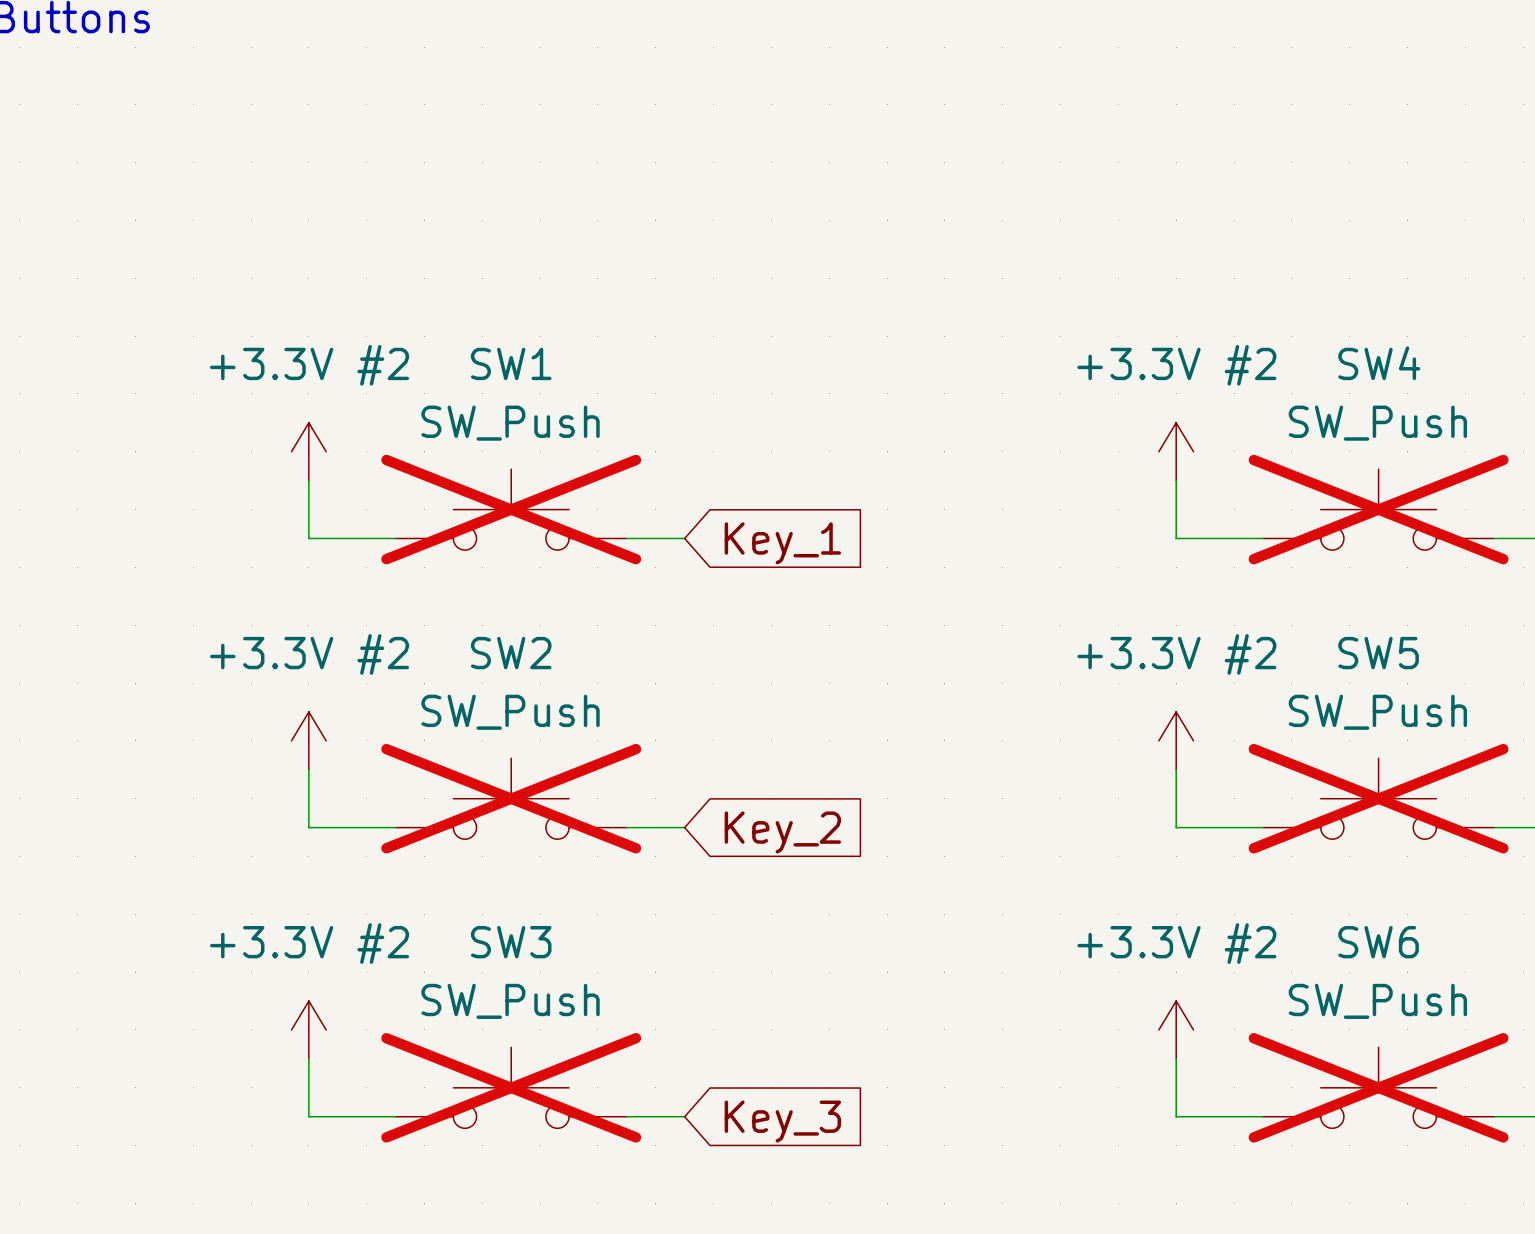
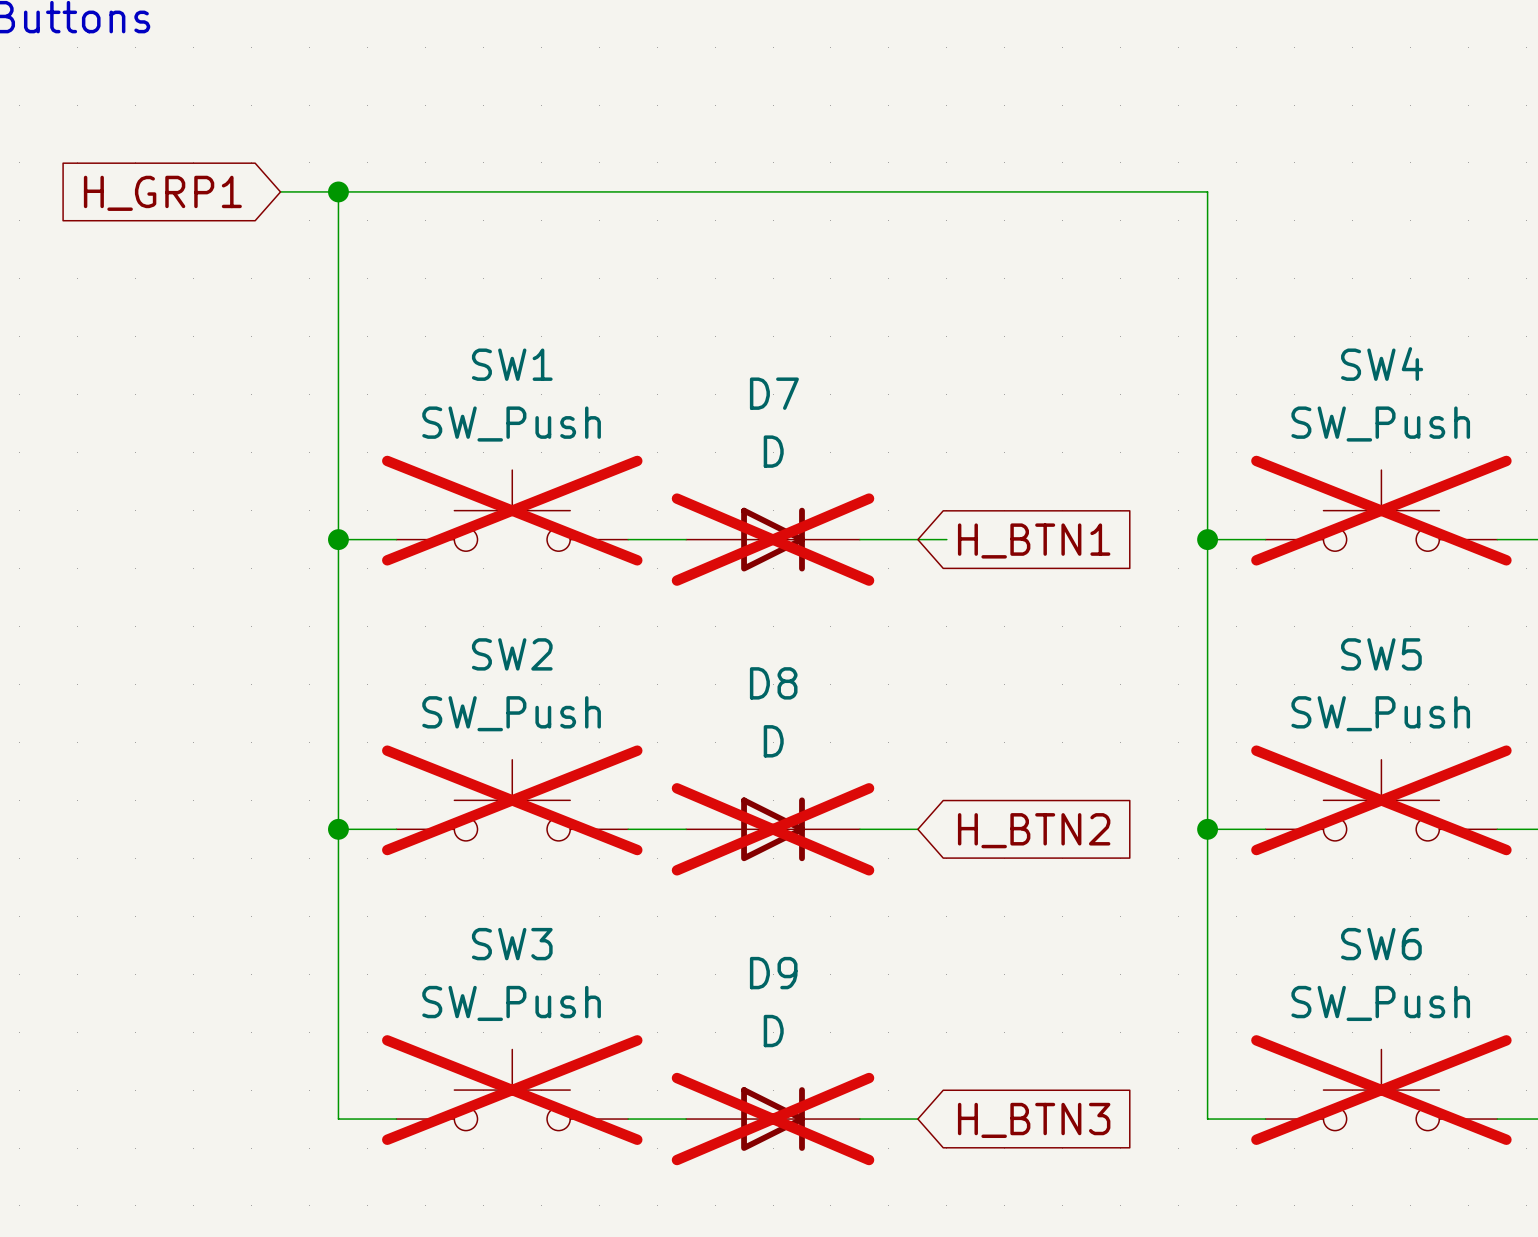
junction: none -> (338, 191)
global label: none -> H_GRP1 (162, 193)
power symbol: +3.3V #2 (308, 451) -> none
power symbol: +3.3V #2 (1176, 451) -> none
wire: (308, 480) (308, 538) (337, 538) -> none
wire: (1176, 480) (1176, 538) (1205, 538) -> none
junction: none -> (338, 539)
D7: none -> D (773, 539)
wire: none -> (859, 539) (946, 539)
junction: none -> (1207, 539)
global label: none -> H_BTN1 (1034, 540)
global label: Key_1 (782, 543) -> none
power symbol: +3.3V #2 (308, 740) -> none
power symbol: +3.3V #2 (1176, 740) -> none
wire: (308, 769) (308, 827) (337, 827) -> none
wire: (1176, 769) (1176, 827) (1205, 827) -> none
junction: none -> (338, 829)
D8: none -> D (773, 829)
wire: none -> (859, 829) (917, 829)
junction: none -> (1207, 829)
global label: none -> H_BTN2 (1034, 830)
global label: Key_2 (782, 832) -> none
power symbol: +3.3V #2 (308, 1029) -> none
power symbol: +3.3V #2 (1176, 1029) -> none
wire: (308, 1058) (308, 1116) (337, 1116) -> (338, 191) (338, 1119)
wire: (1176, 1058) (1176, 1116) (1205, 1116) -> (280, 191) (1207, 191) (1207, 1119)
D9: none -> D (773, 1119)
wire: none -> (859, 1119) (917, 1119)
global label: none -> H_BTN3 (1034, 1120)
global label: Key_3 (782, 1121) -> none

